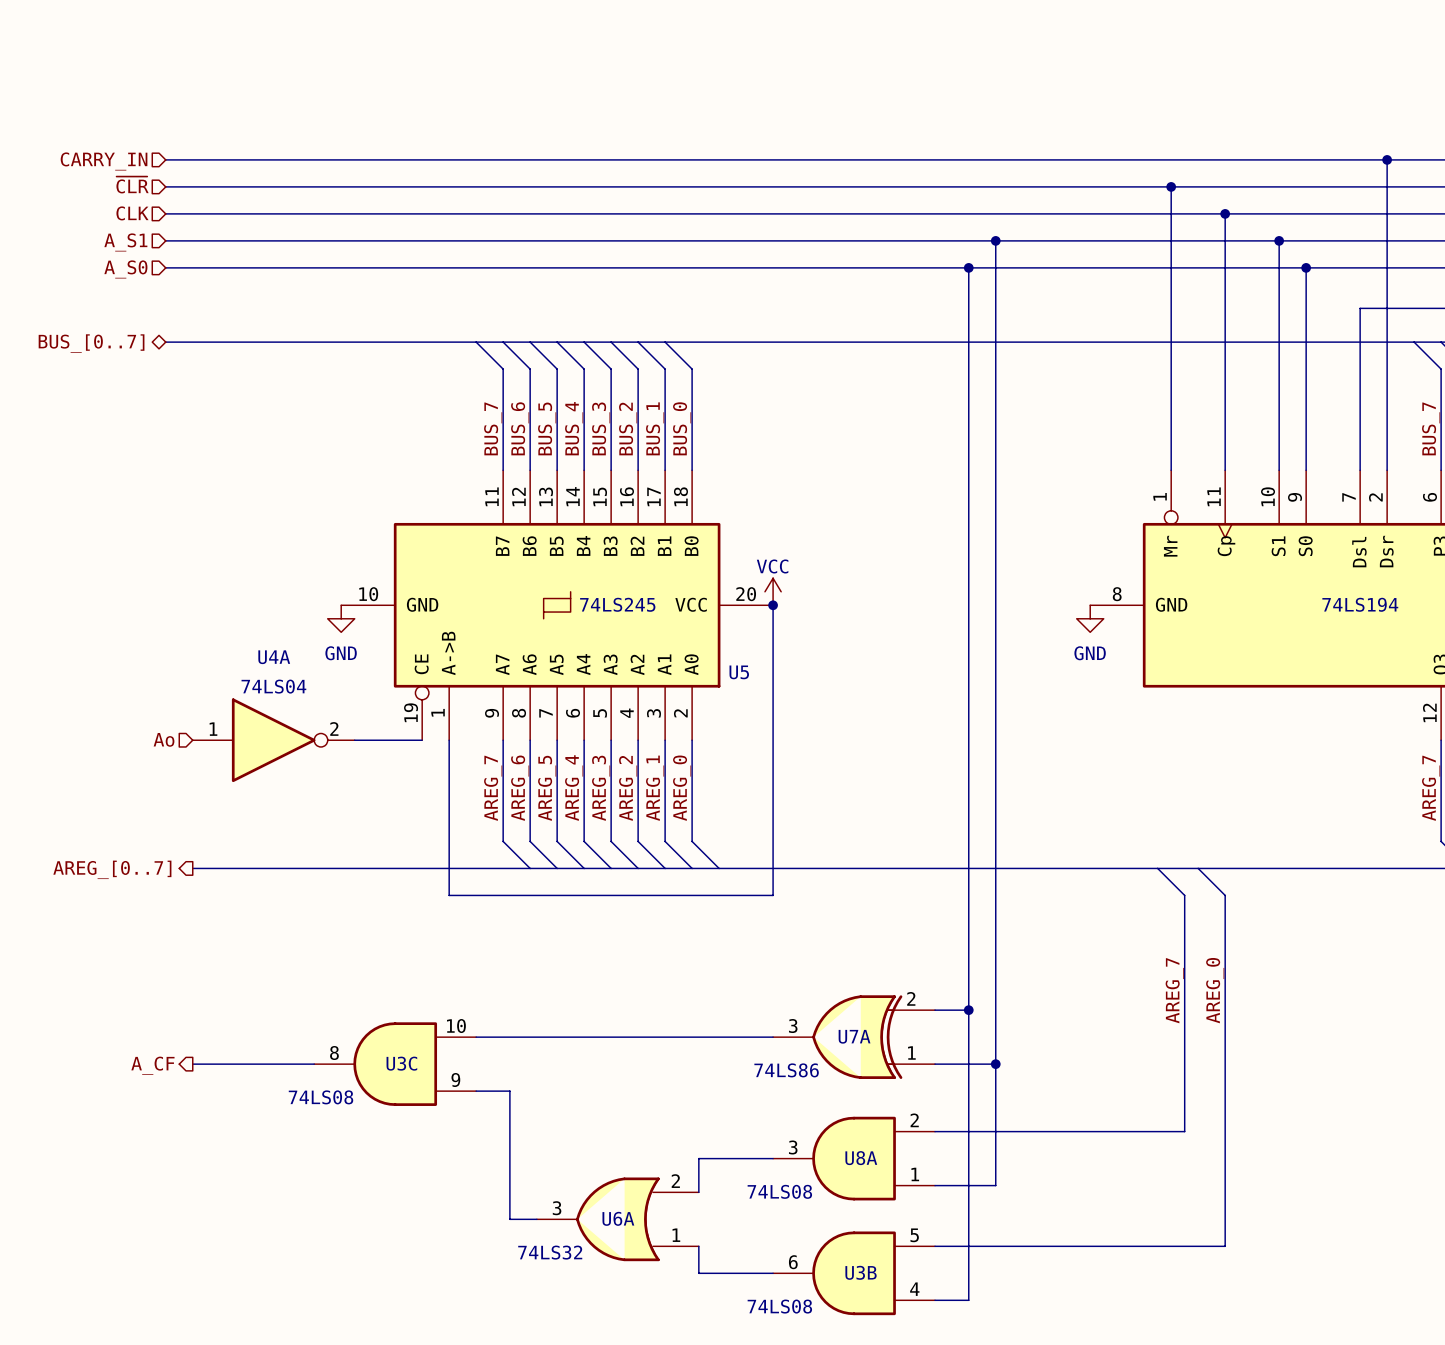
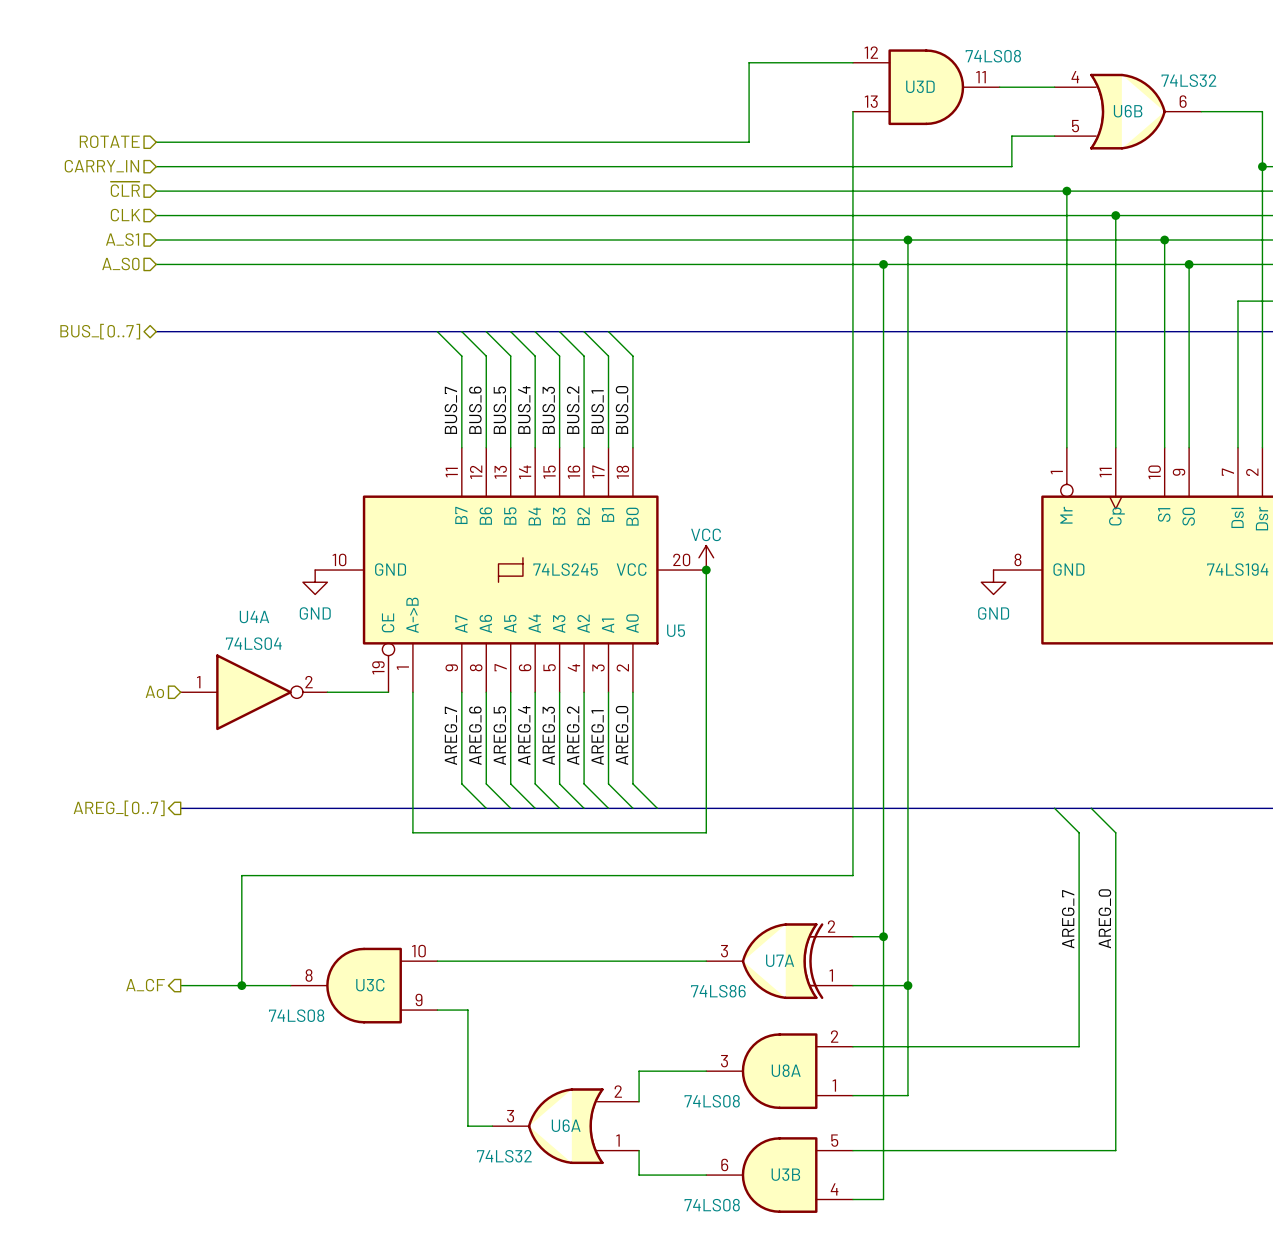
wire: none -> (852, 62) (749, 62) (749, 142) (156, 142)
U3D: none -> 74LS08 (926, 87)
wire: none -> (999, 87) (1054, 87)
wire: none -> (852, 111) (852, 875) (241, 875) (241, 985)
U6B: none -> 74LS32 (1127, 111)
wire: none -> (1054, 136) (1011, 136) (1011, 166)
hierarchical label: none -> ROTATE (109, 141)
wire: (1110, 159) (1387, 159) -> (1201, 111) (1262, 111) (1262, 166)
junction: none -> (241, 985)

